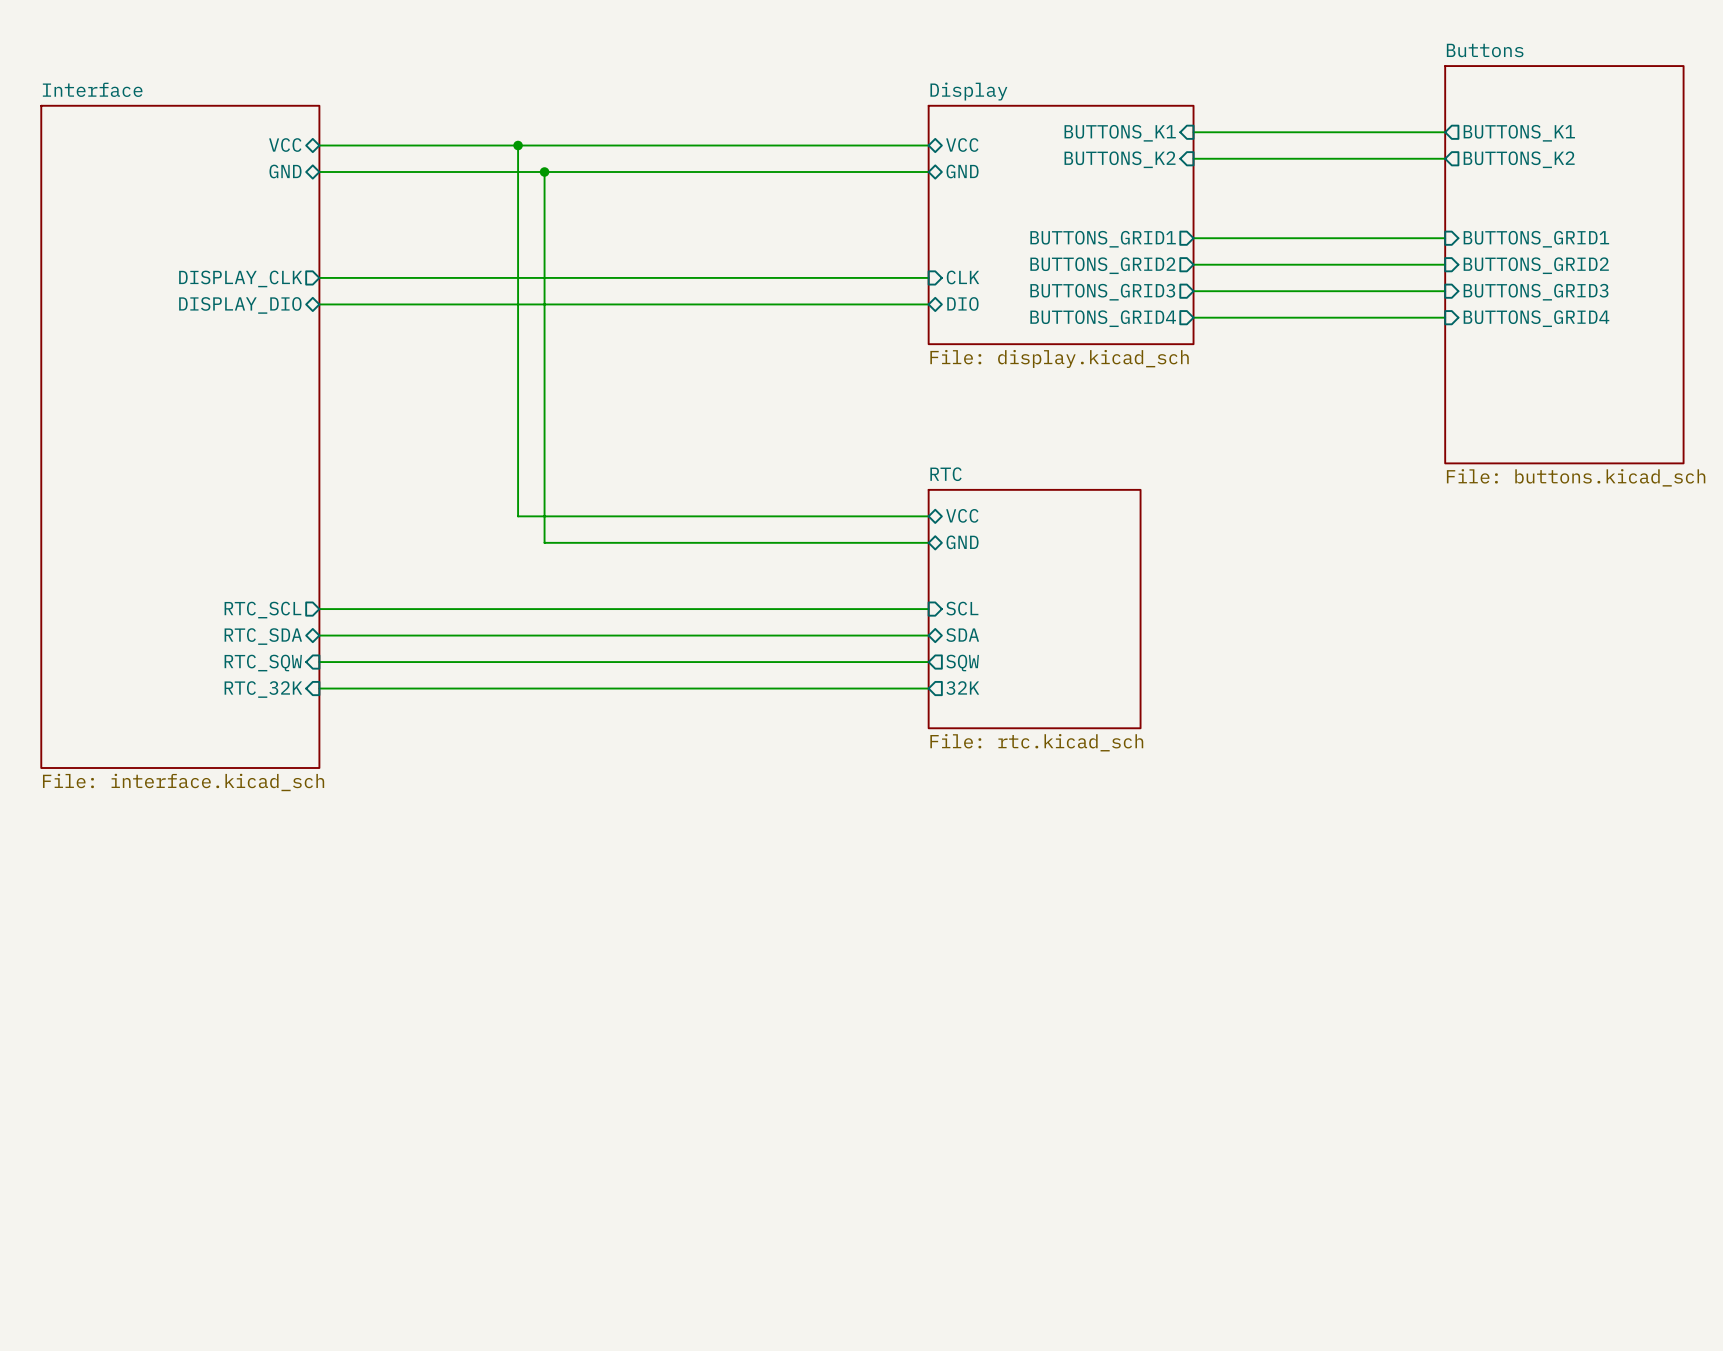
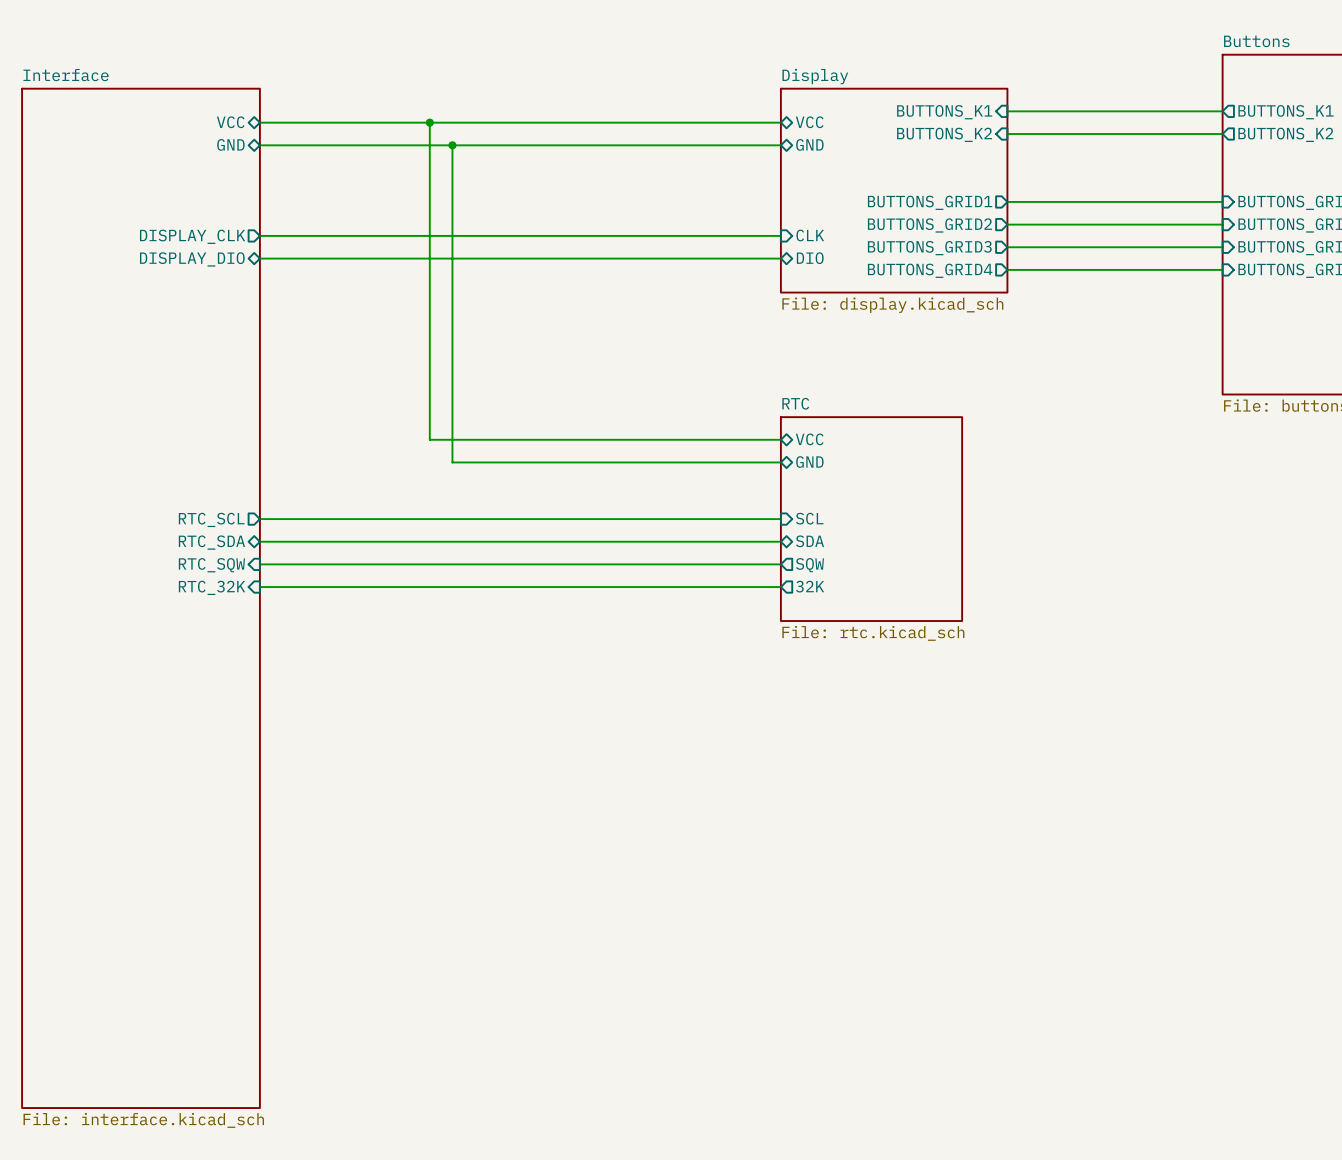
sheet Interface: File: interface.kicad_sch (180, 436) -> none
sheet Interface: none -> File: interface.kicad_sch (141, 598)

